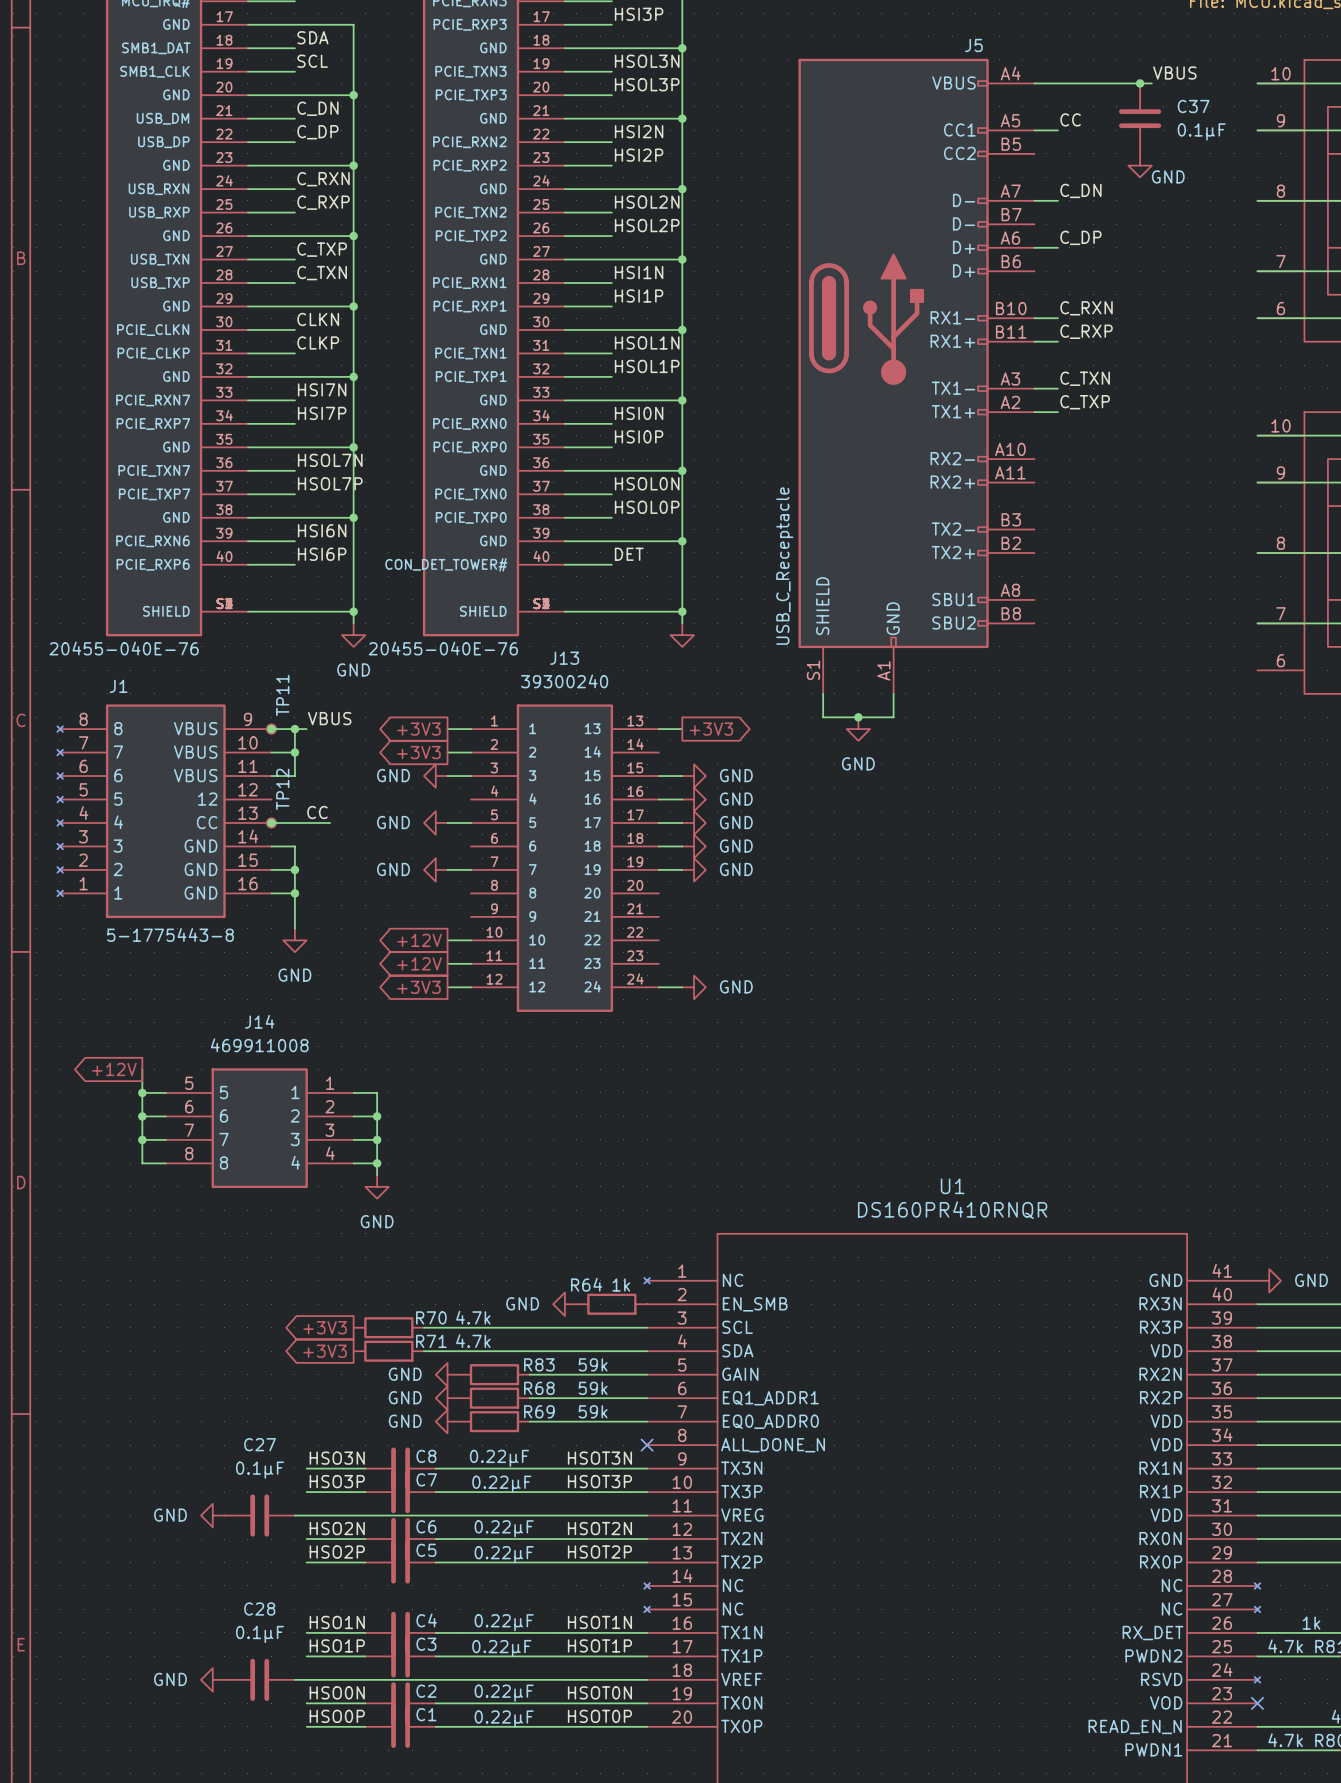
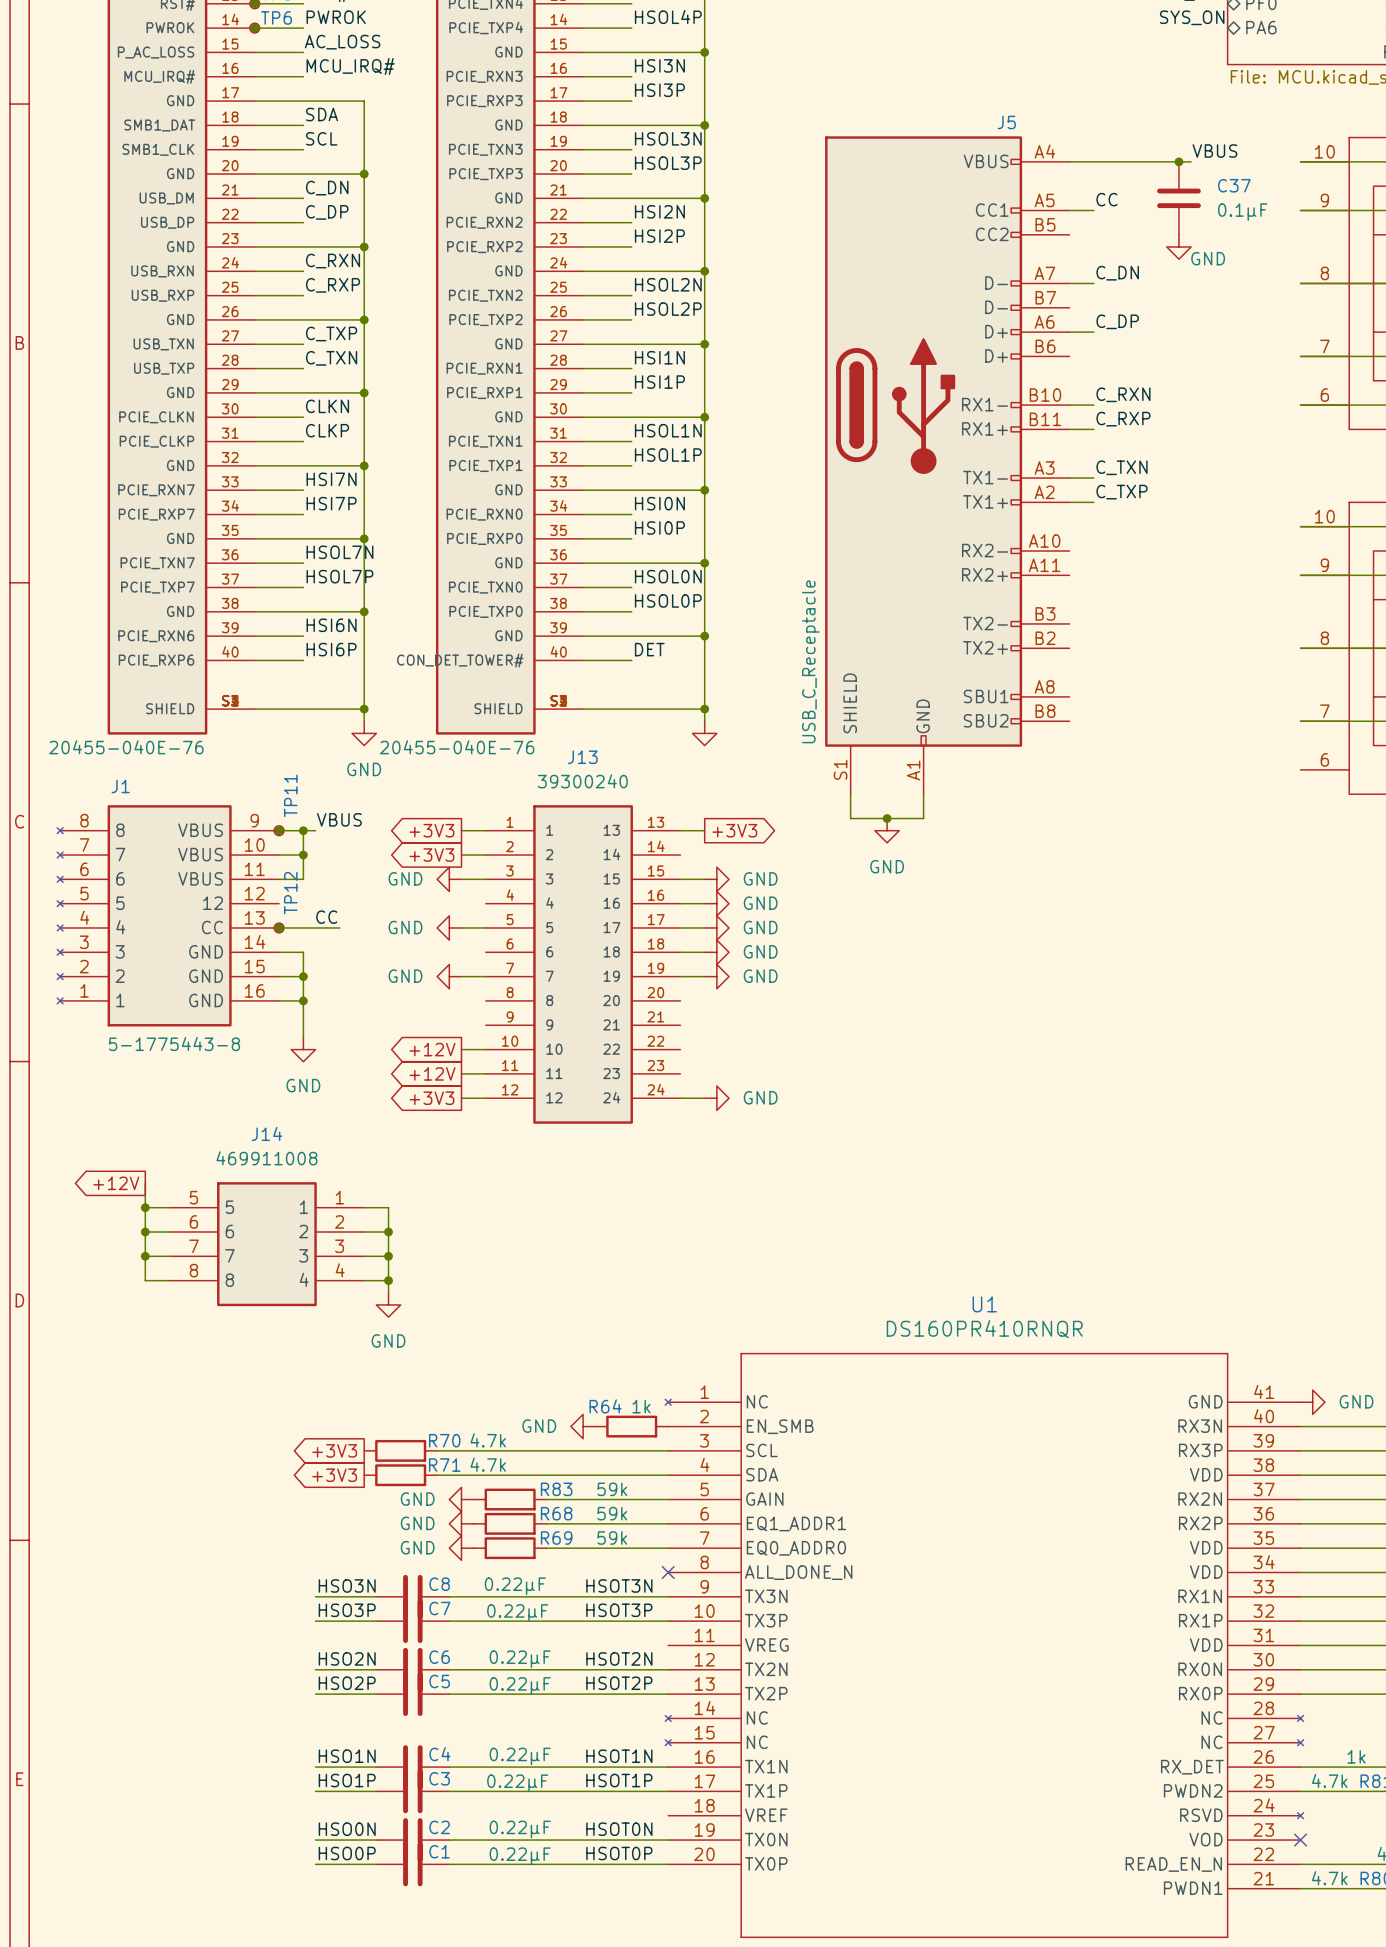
power symbol: GND (212, 1515) -> none
C27: 0.1μF (259, 1515) -> none
wire: (294, 1515) (647, 1515) -> none
power symbol: GND (212, 1679) -> none
C28: 0.1μF (259, 1679) -> none
wire: (294, 1679) (647, 1679) -> none

